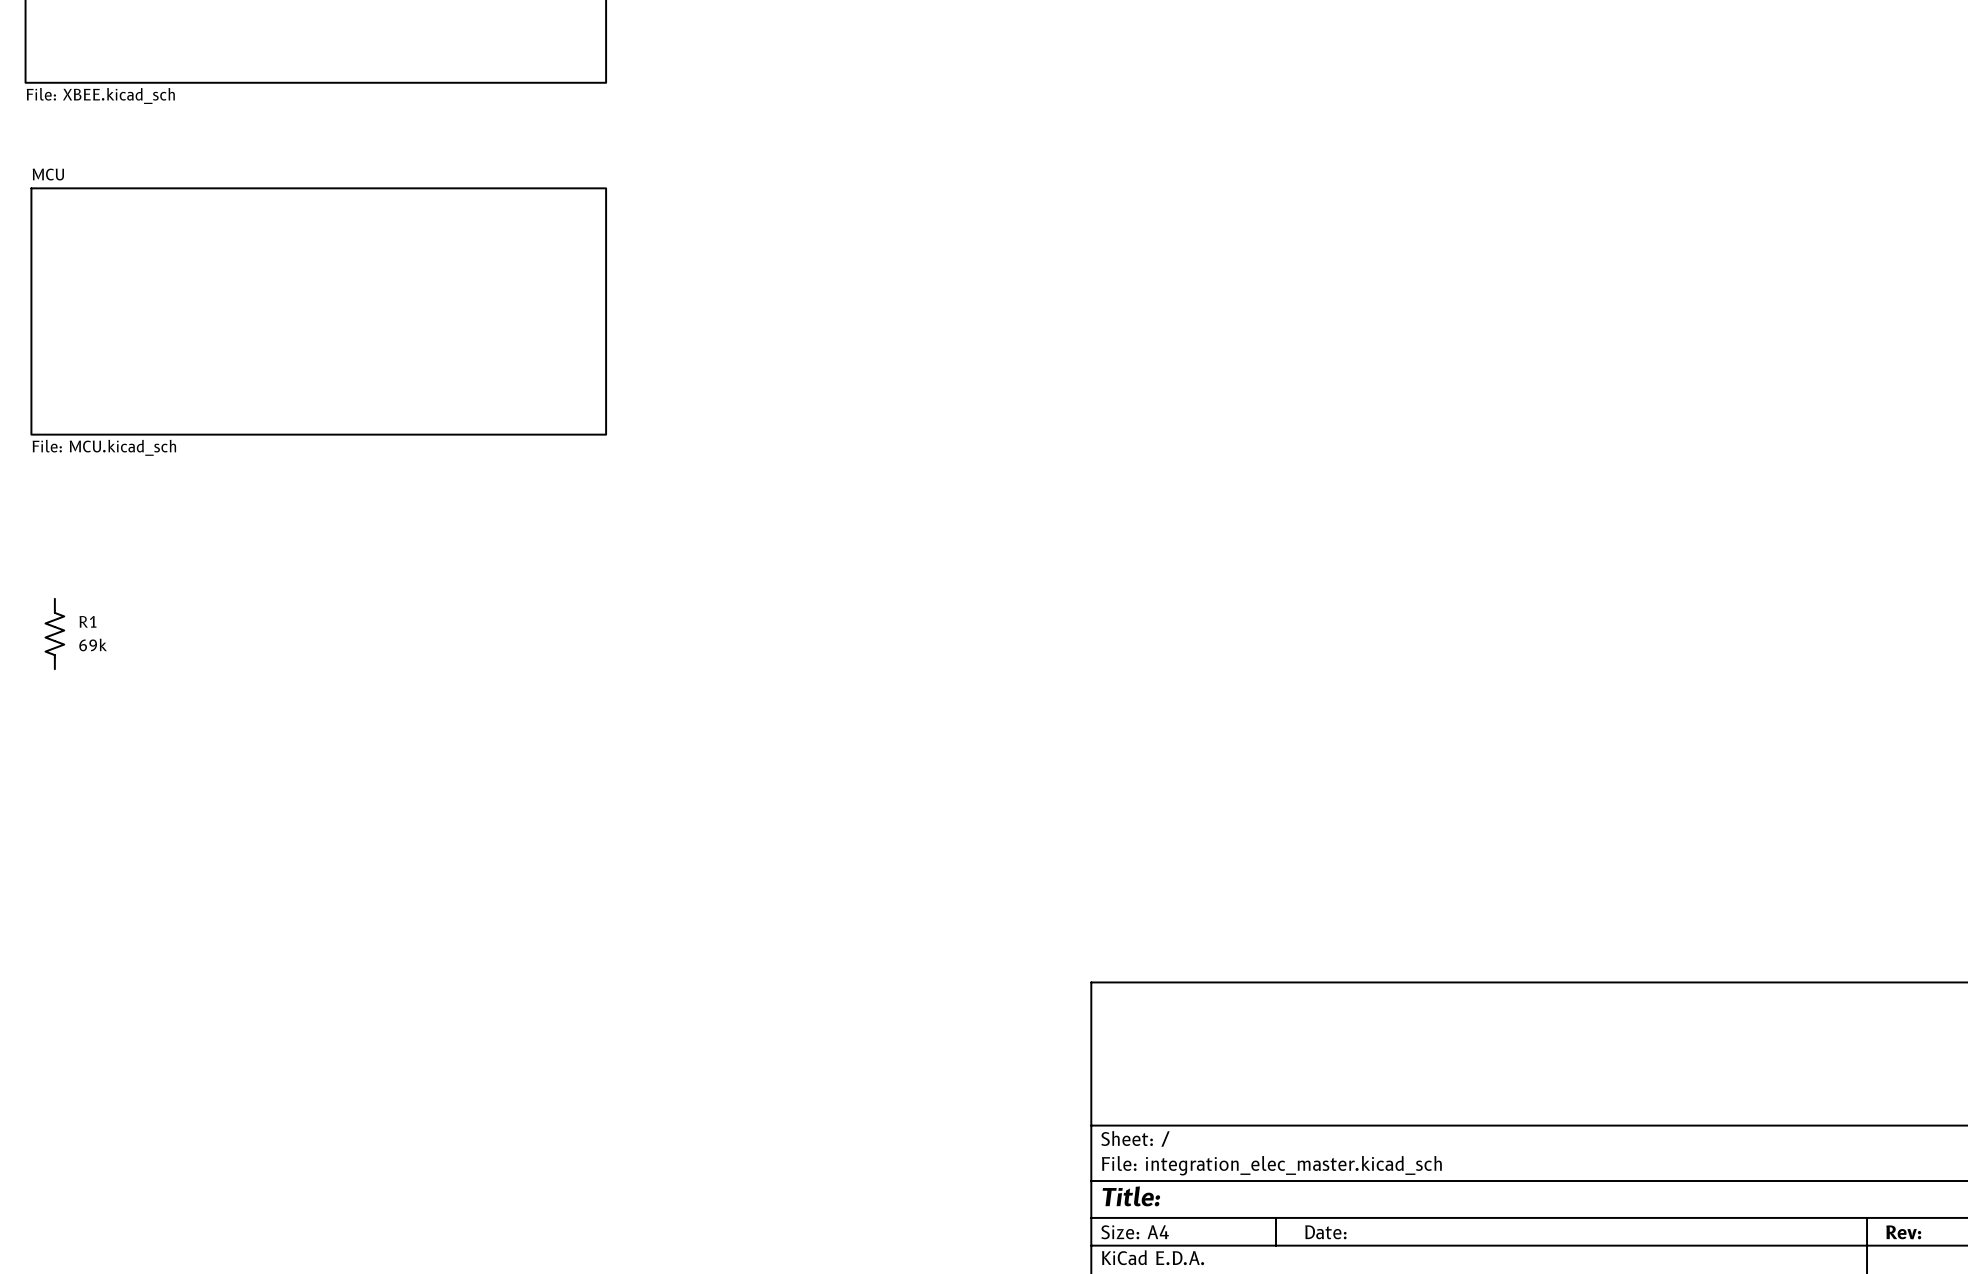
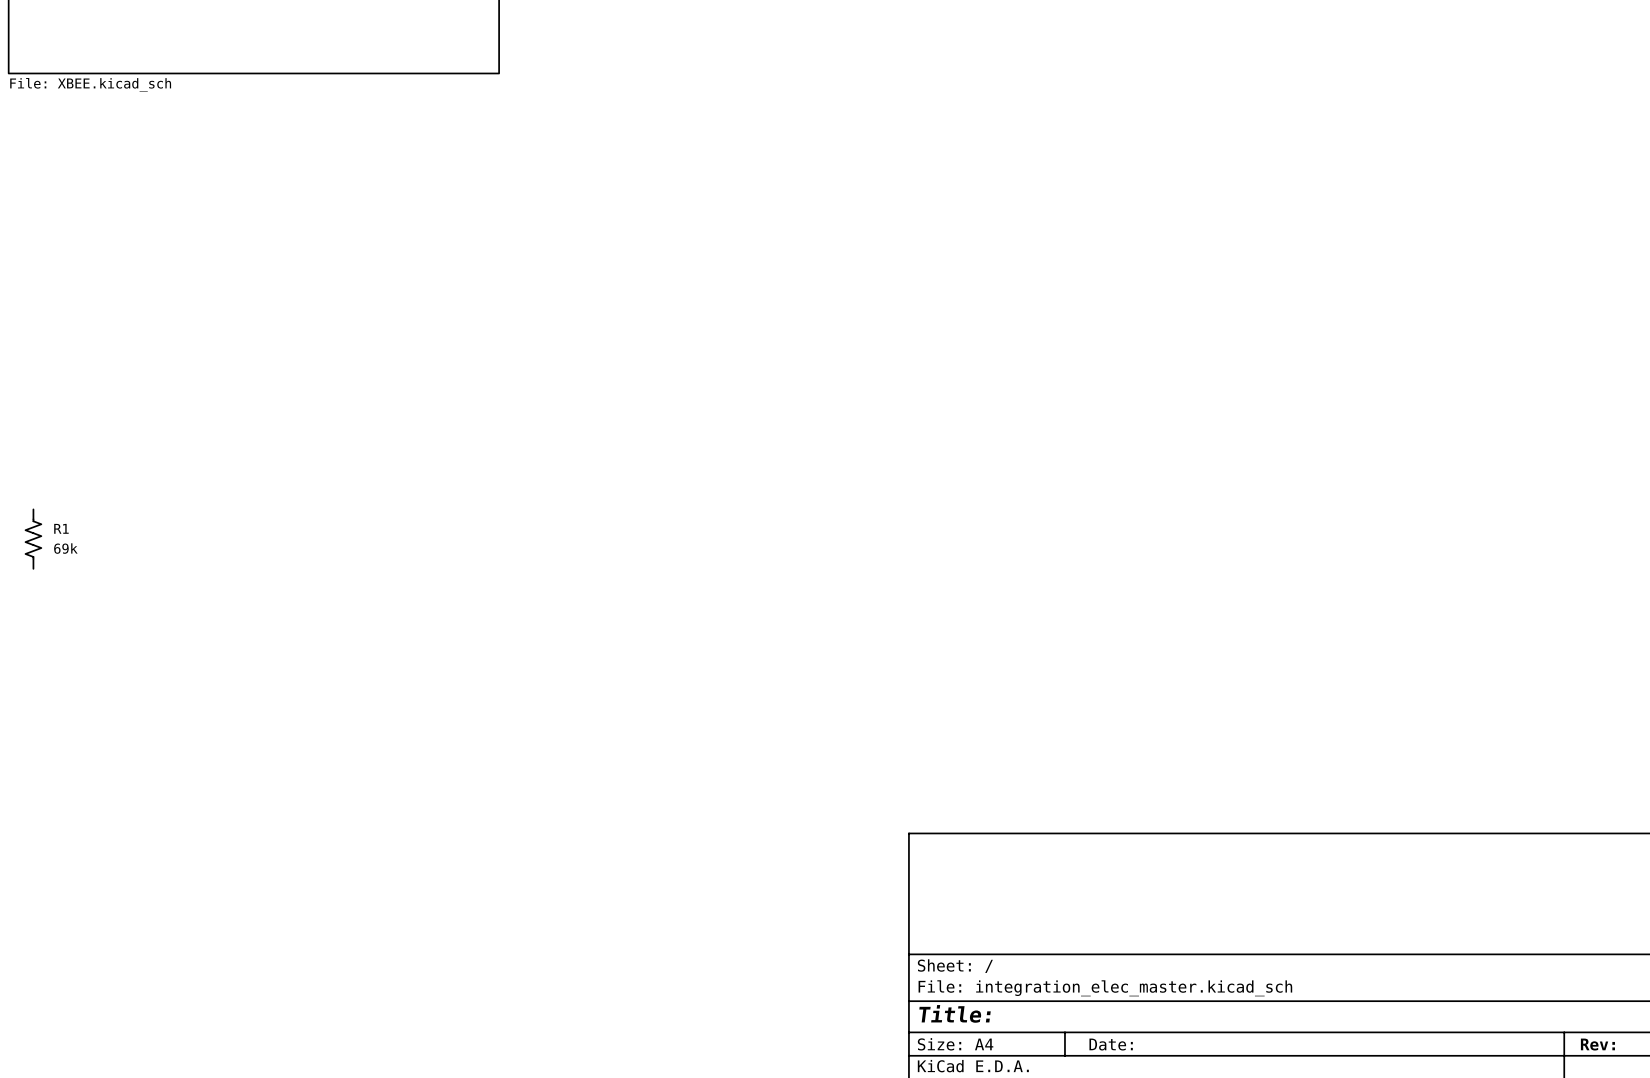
sheet MCU: File: MCU.kicad_sch (318, 311) -> none

